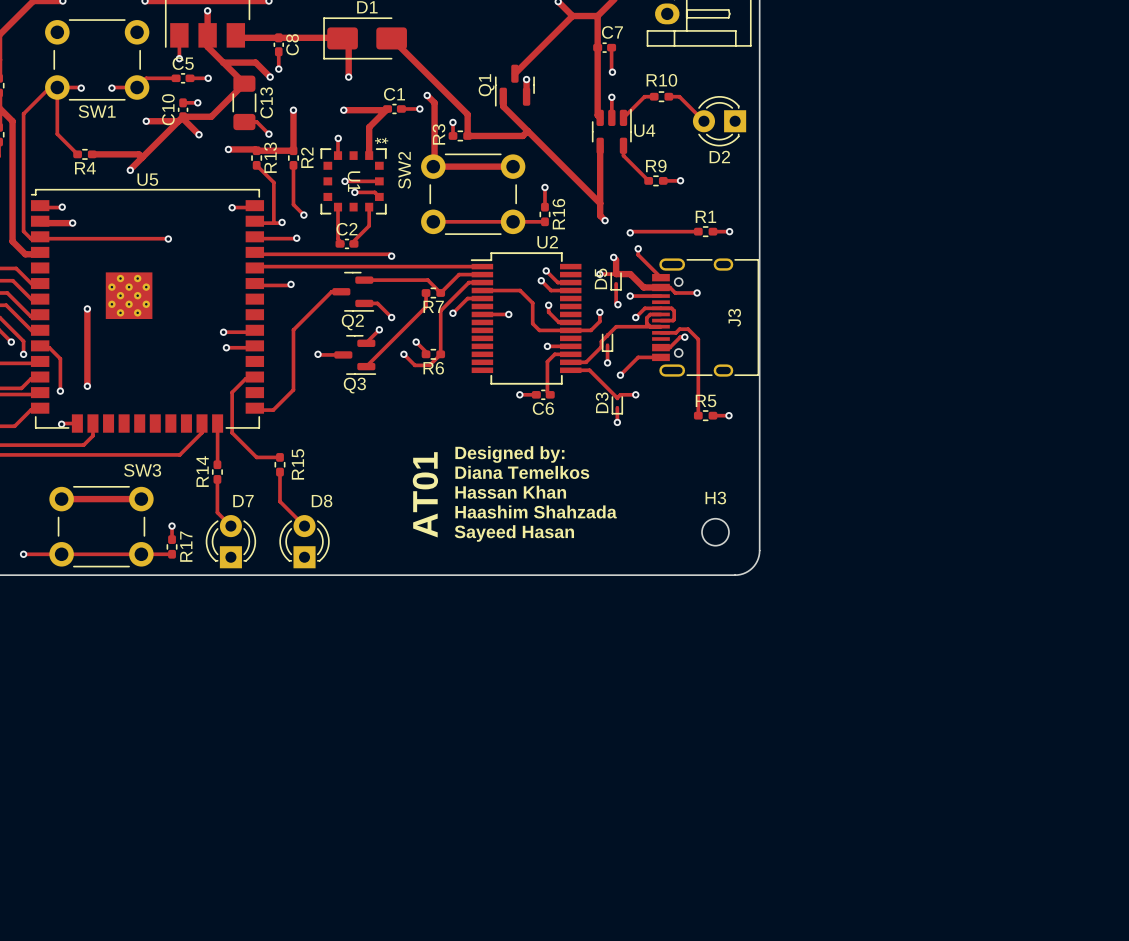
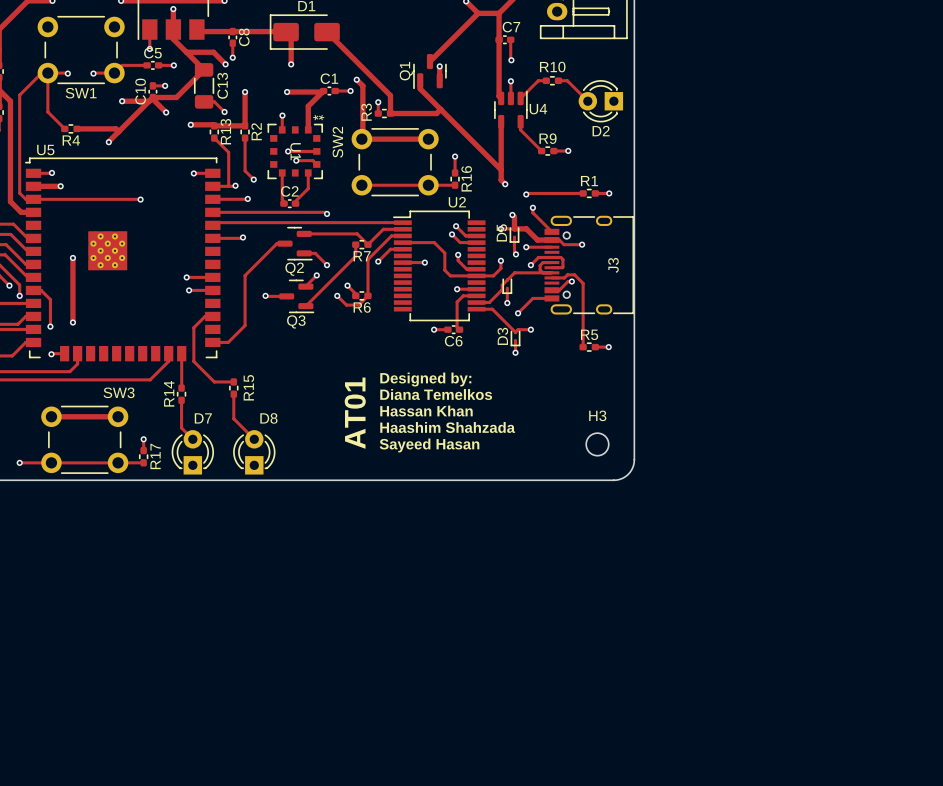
U5 name position: U5 (147, 179) -> U5 (45, 150)
U5 footprint: [30, 188, 265, 433] -> [25, 157, 221, 362]

